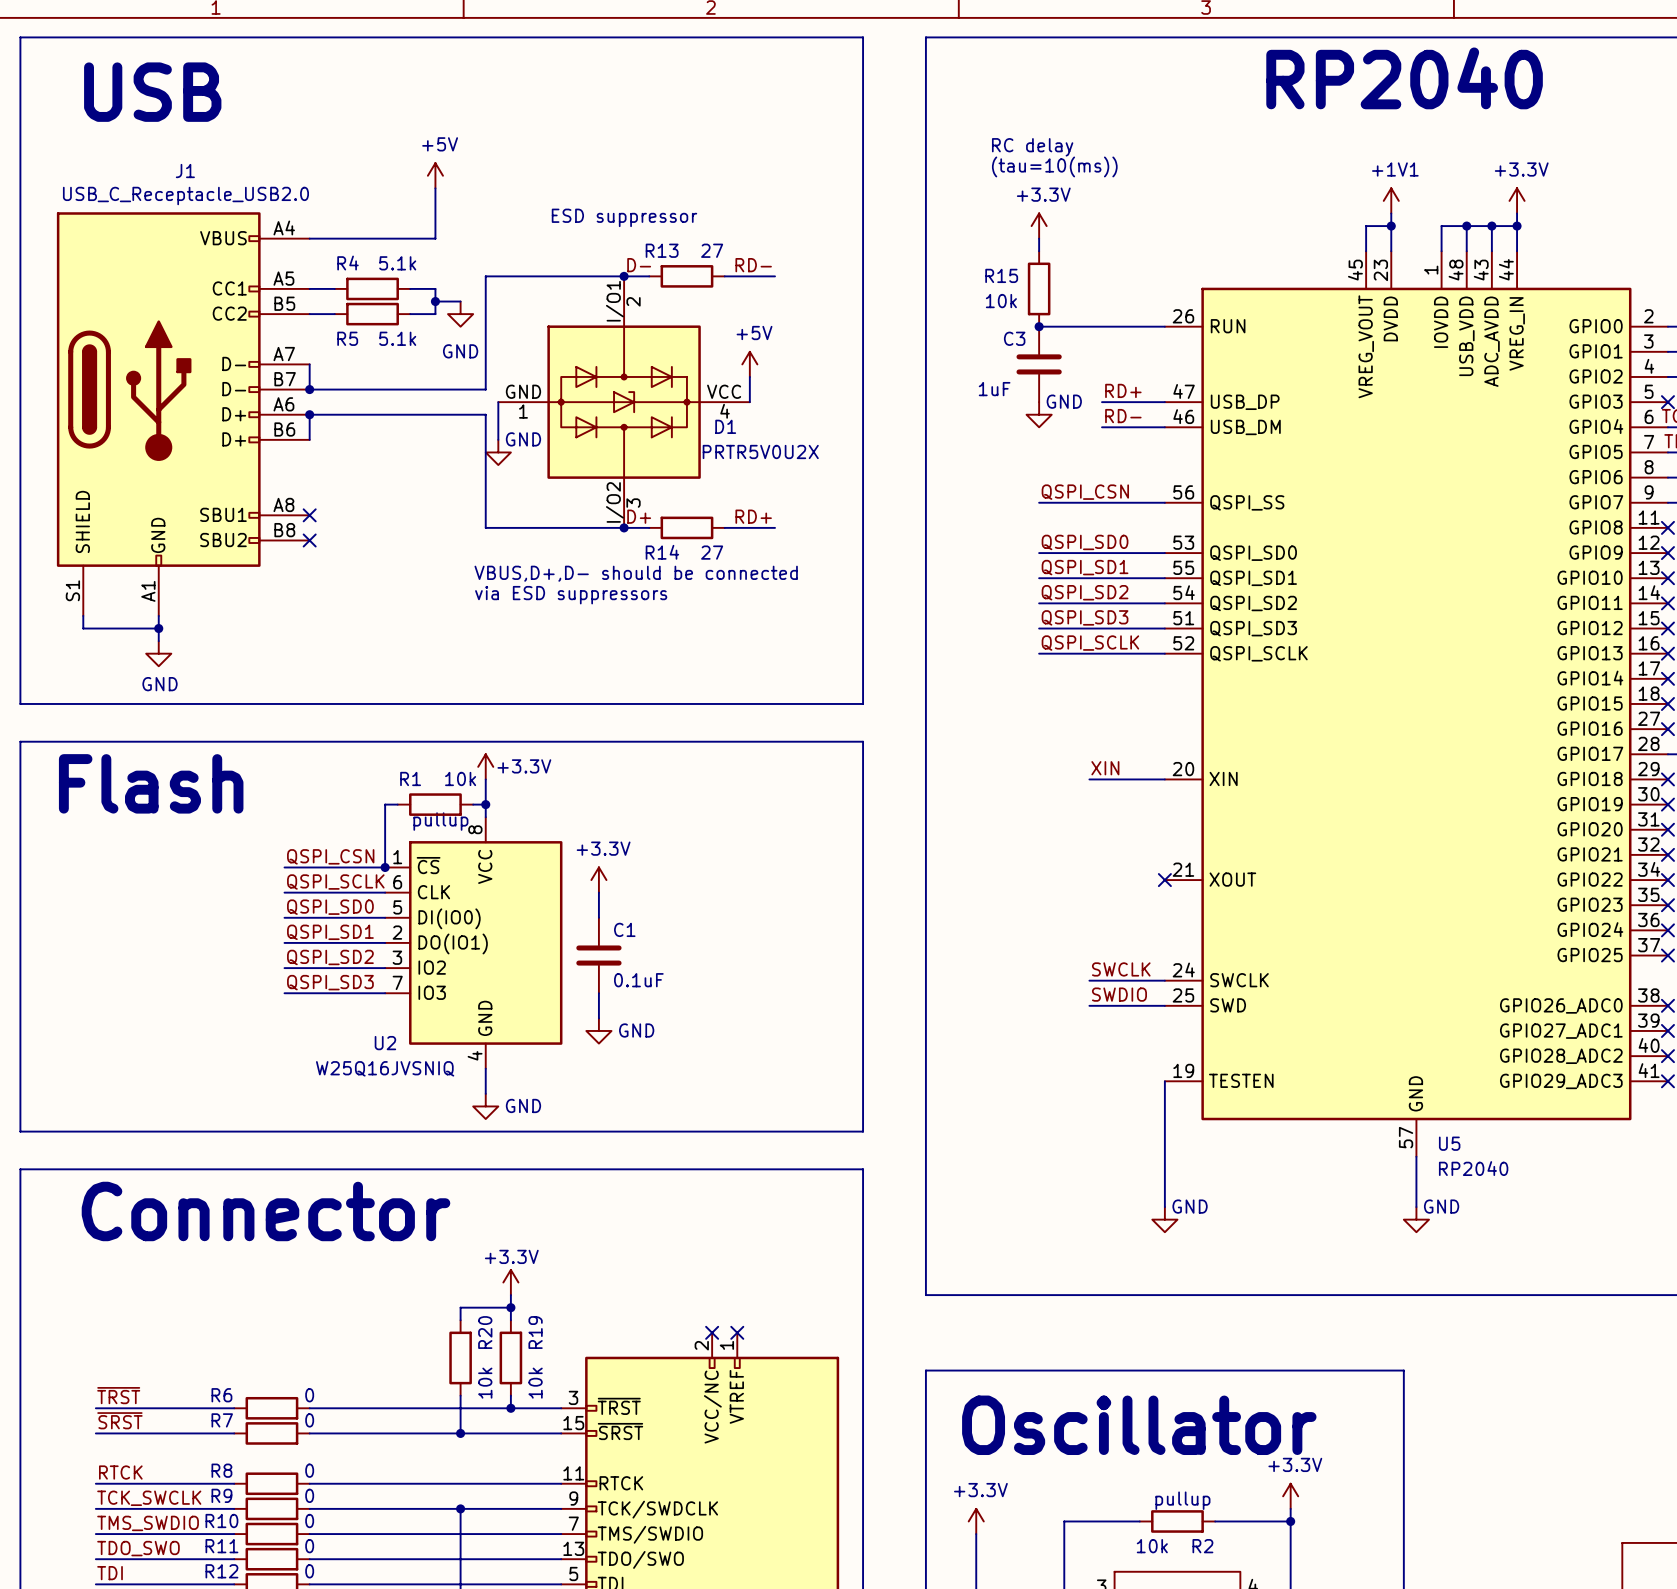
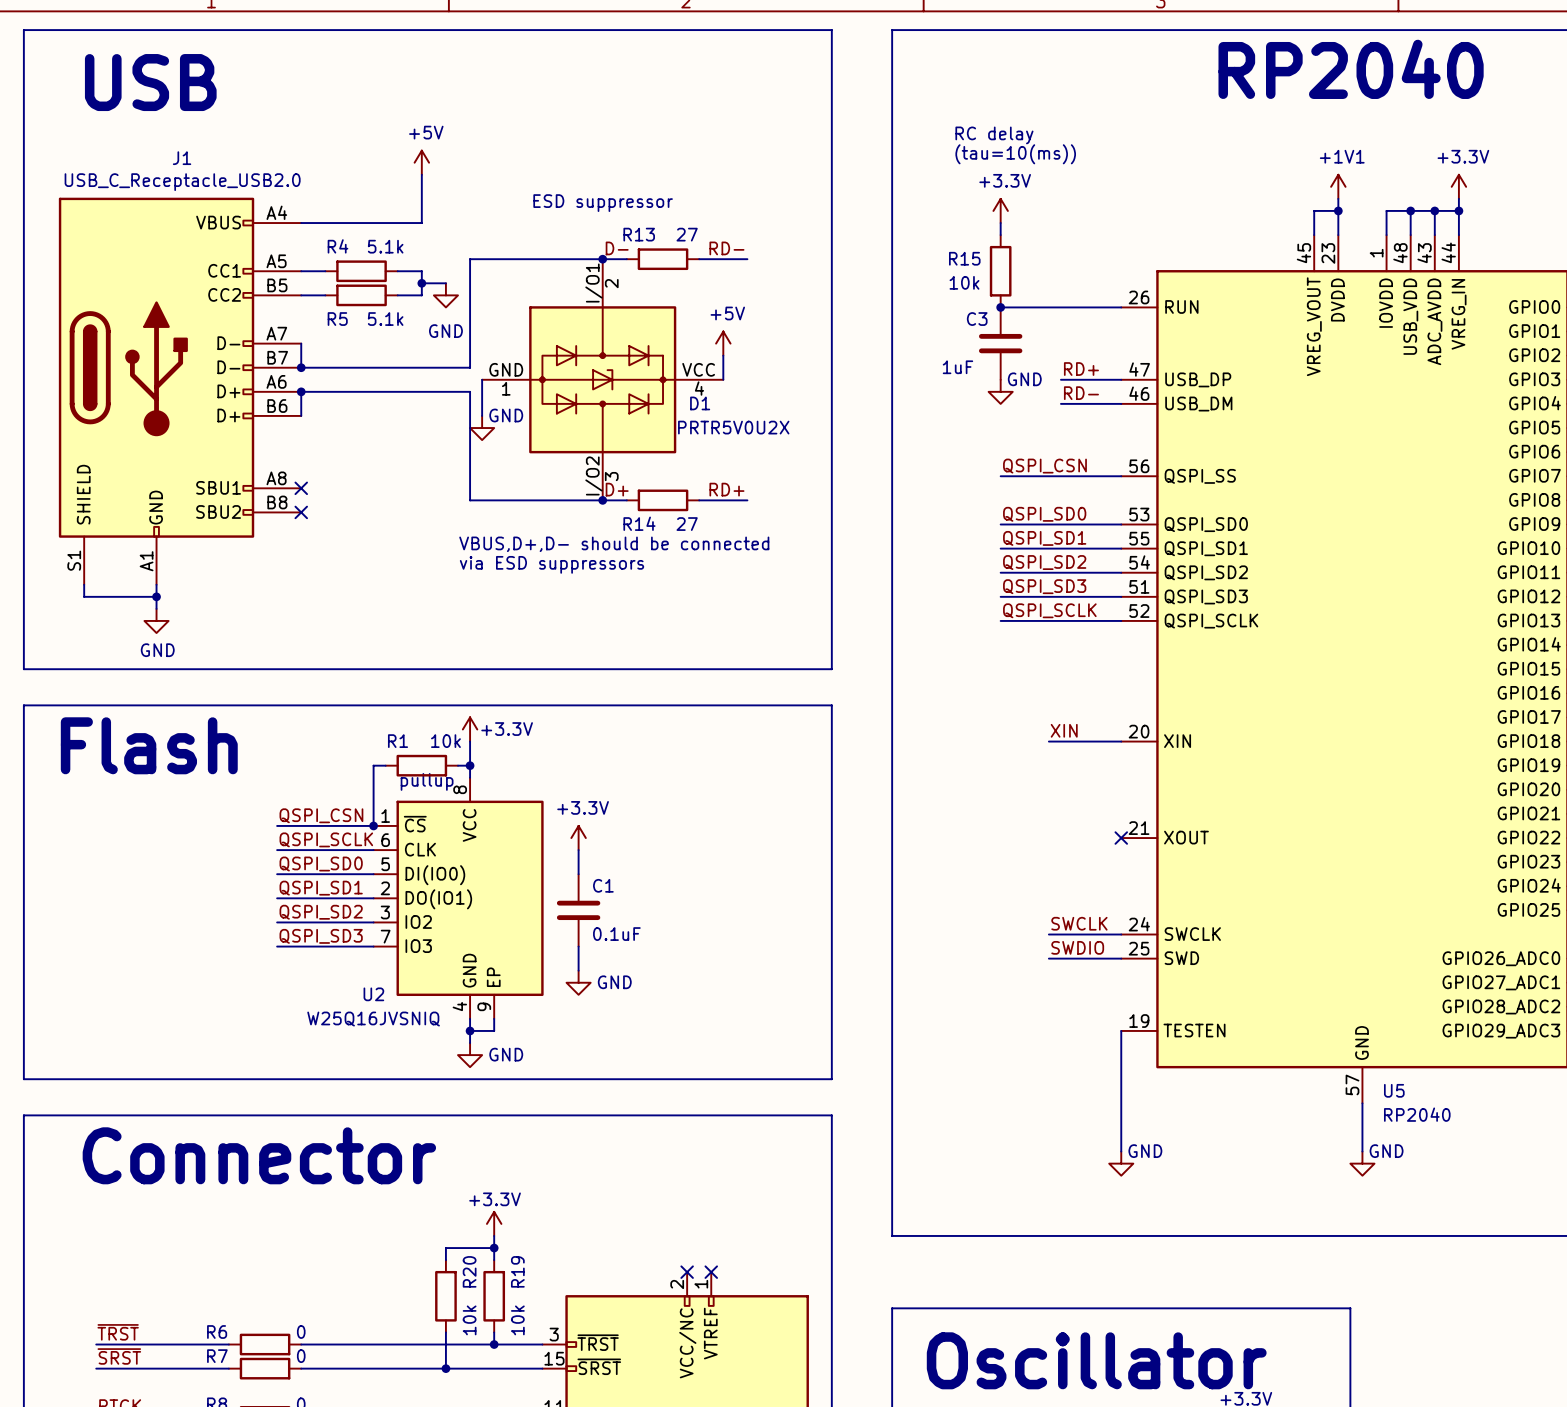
U2 symbol: [385, 817, 563, 1069] -> [373, 777, 544, 1019]
wire: none -> (494, 1018) (494, 1030) (470, 1030)
junction: none -> (470, 1030)

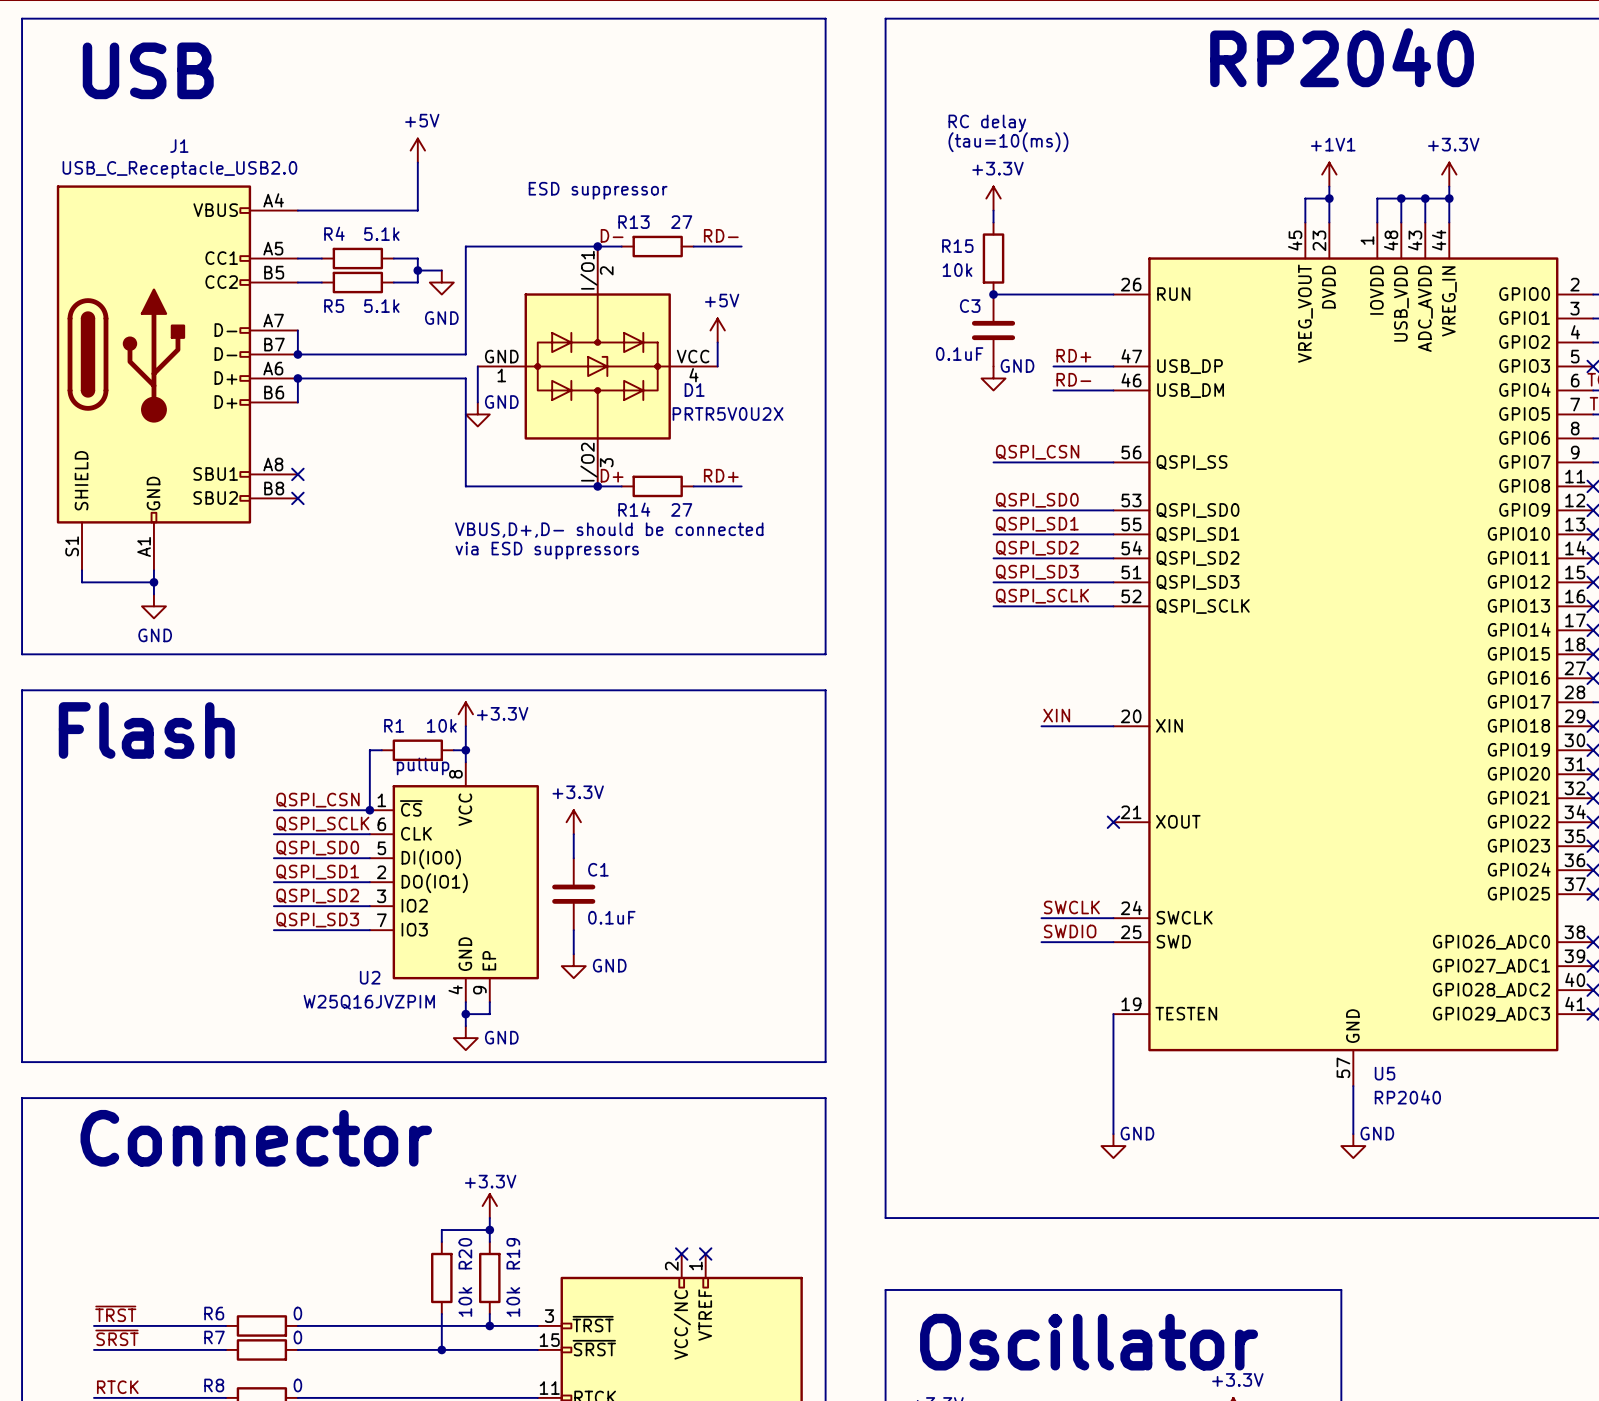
C3 value: 1uF (957, 367) -> 0.1uF (959, 354)
U2 value: W25Q16JVSNIQ (373, 1019) -> W25Q16JVZPIM (369, 1002)

